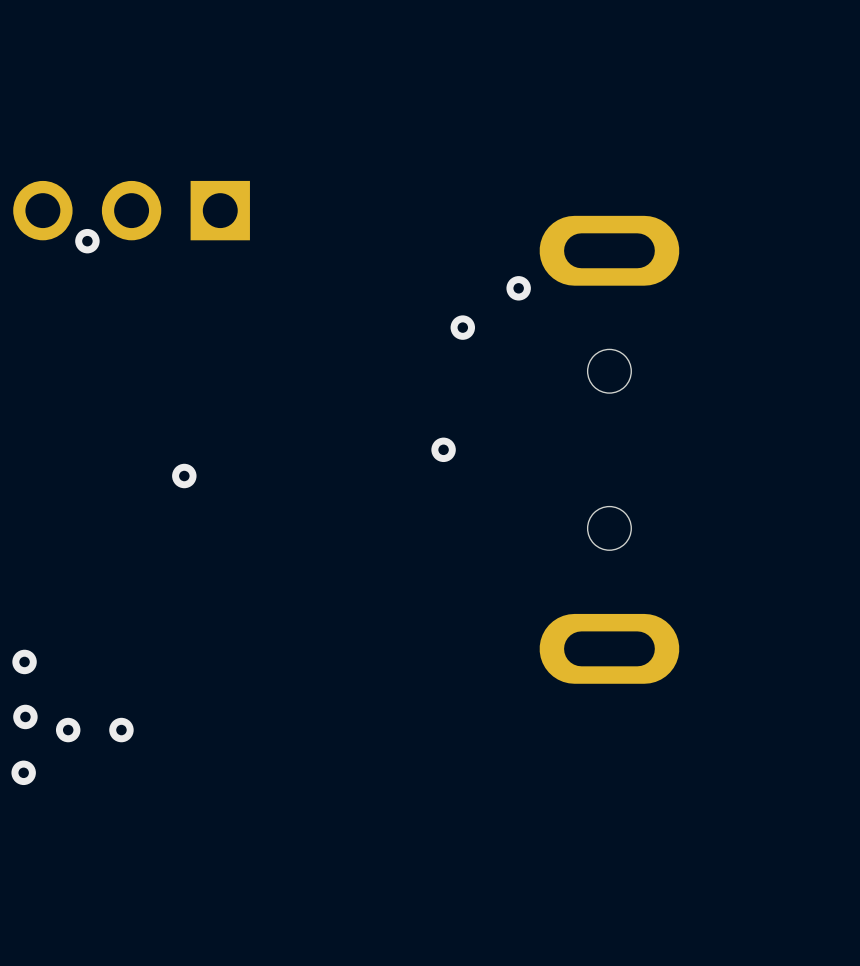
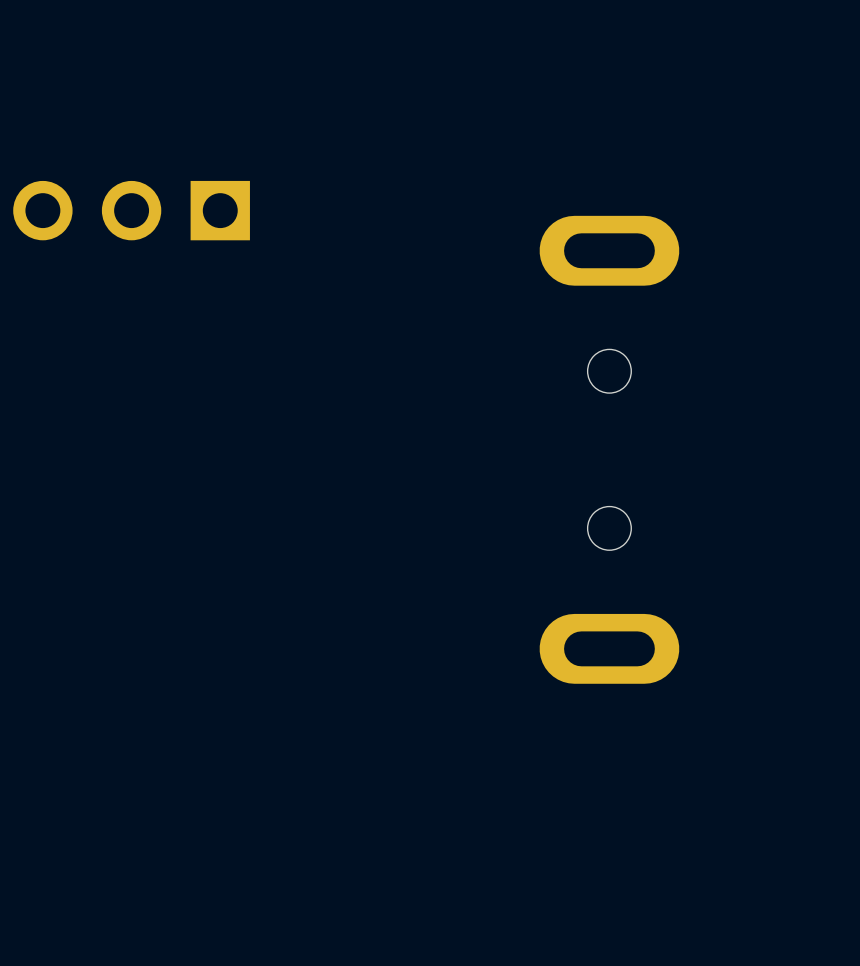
via: (87, 241) -> none
via: (518, 288) -> none
via: (462, 327) -> none
via: (443, 449) -> none
via: (184, 476) -> none
via: (24, 661) -> none
via: (25, 716) -> none
via: (68, 730) -> none
via: (121, 730) -> none
via: (23, 772) -> none

